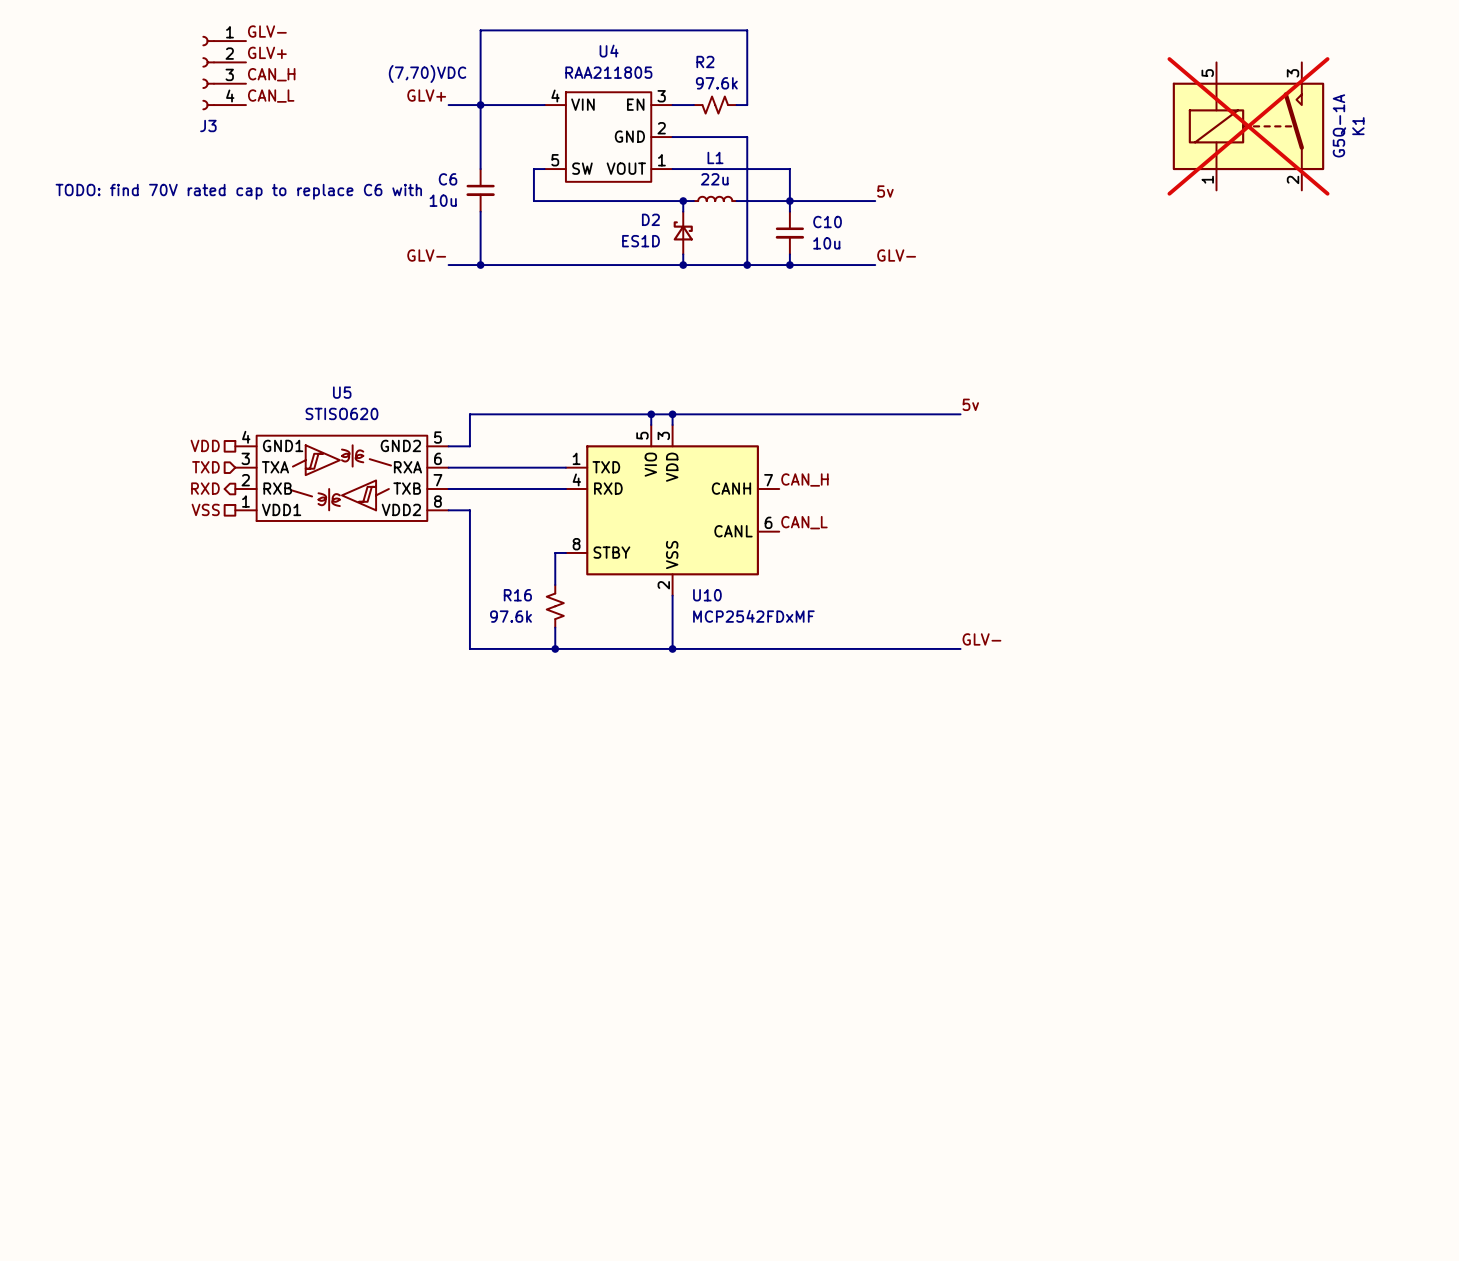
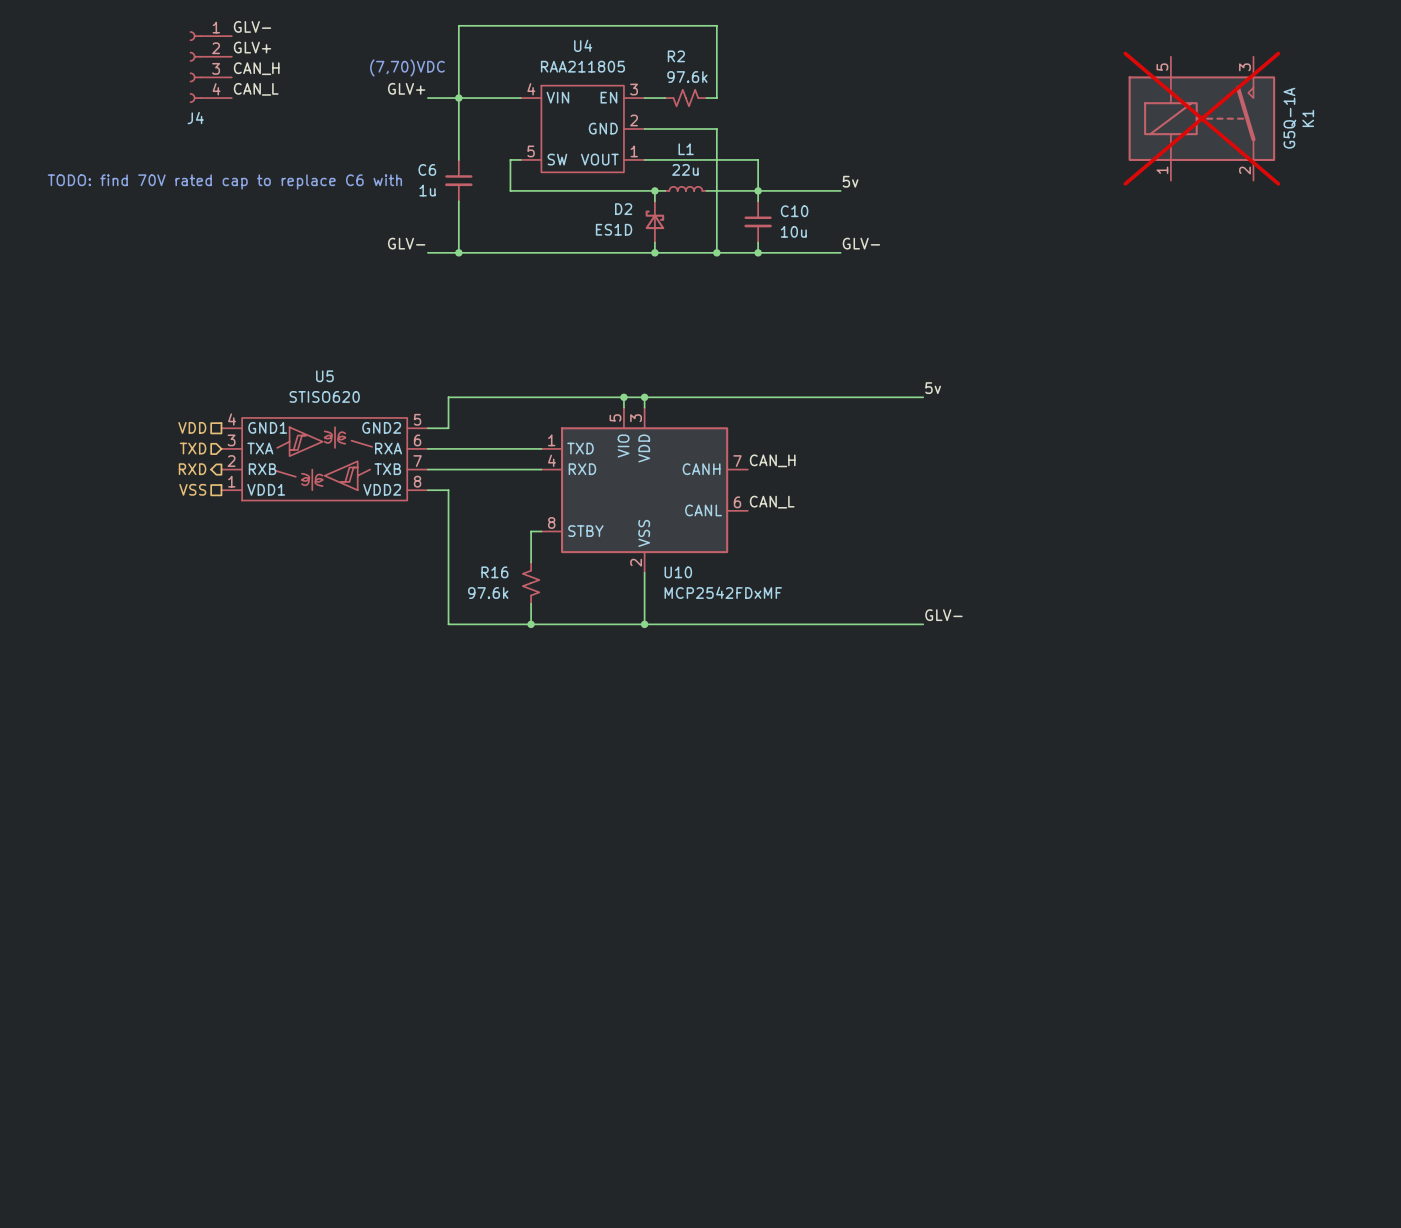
J3 name: J3 (208, 125) -> J4 (195, 118)
C6 value: 10u (443, 200) -> 1u (427, 190)

